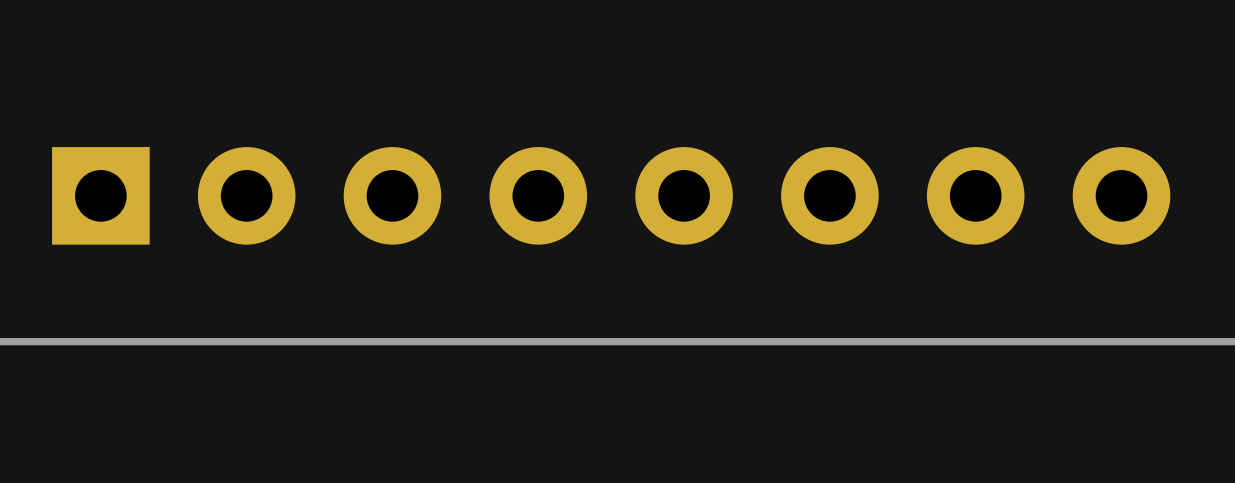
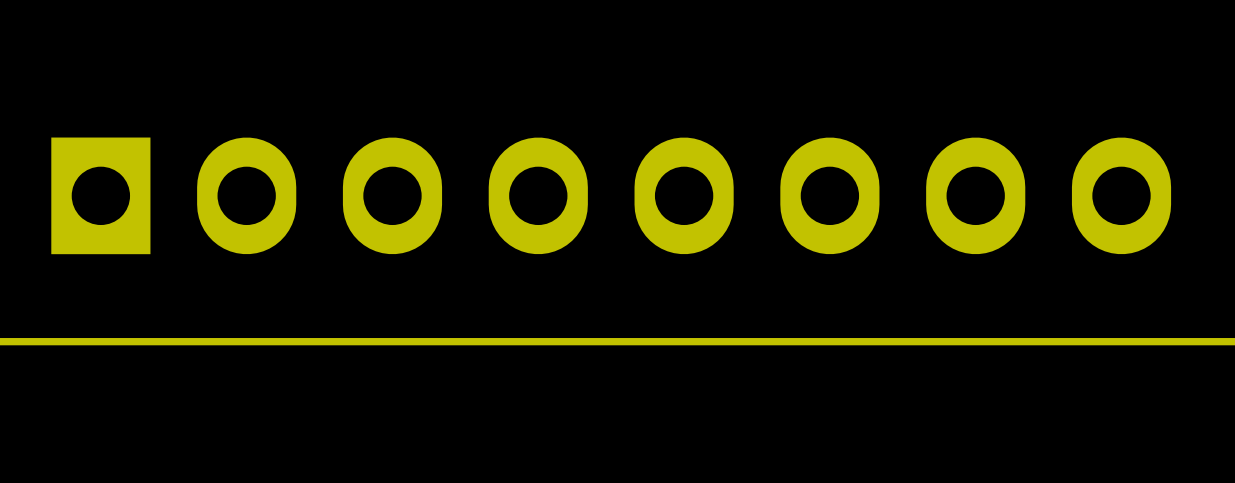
part footprint: [52, 147, 1171, 245] -> [51, 137, 1172, 255]

